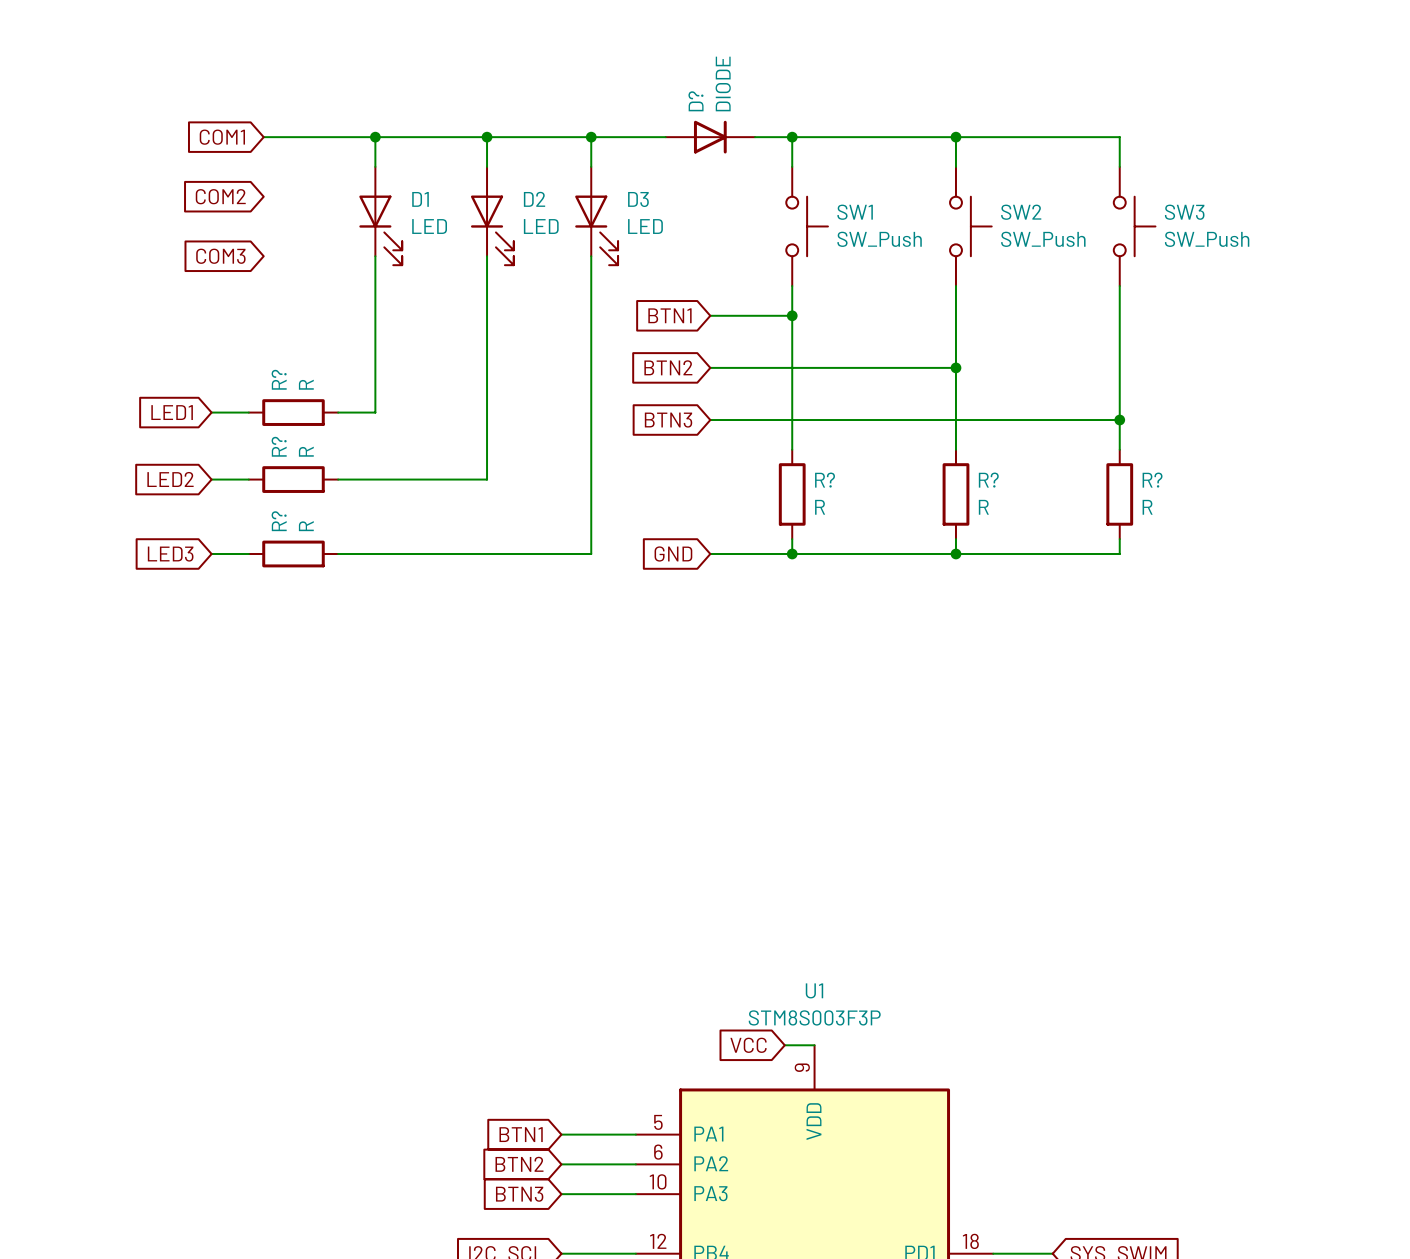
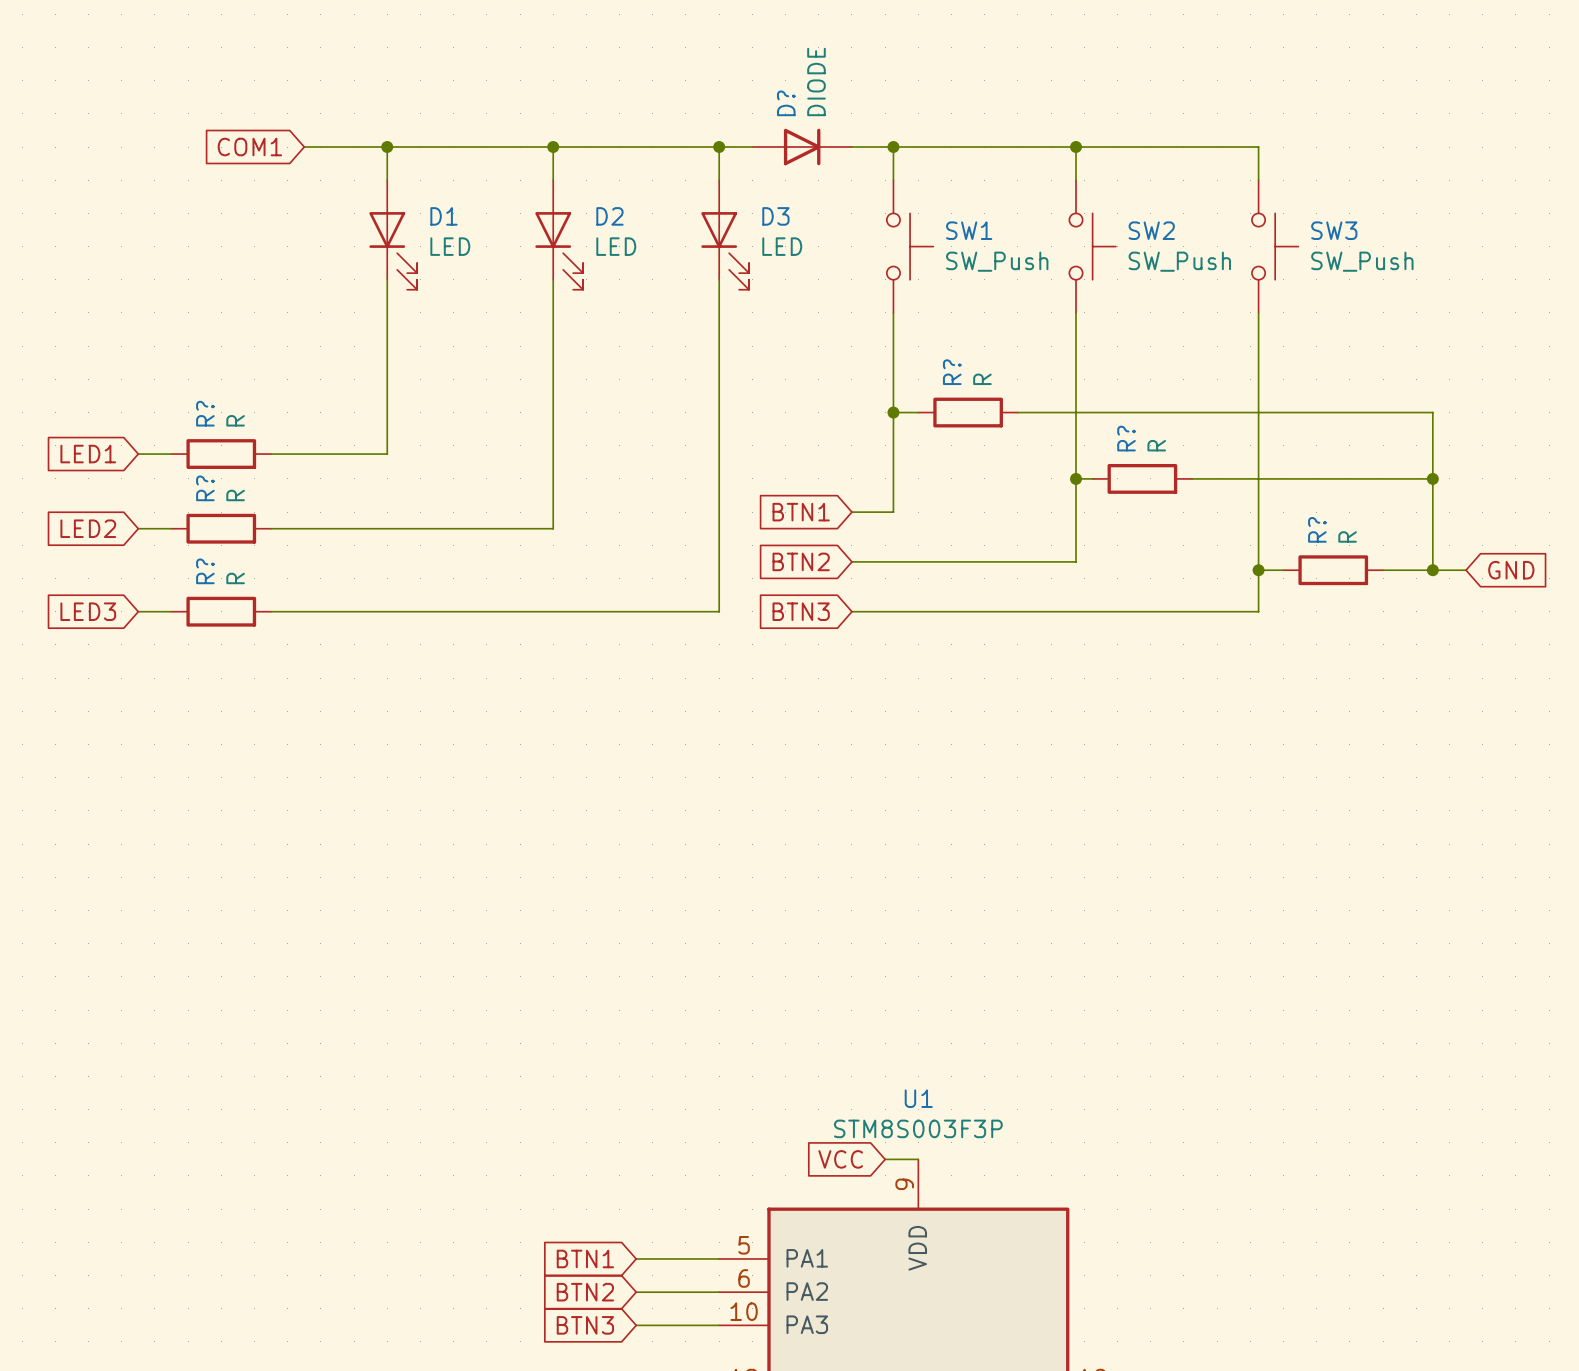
wire: (375, 137) (375, 166) -> (387, 147) (387, 180)
junction position: (375, 137) -> (387, 147)
wire: (591, 137) (591, 166) -> (719, 147) (719, 180)
junction position: (591, 137) -> (719, 147)
global label: COM2 (220, 196) -> none
D1 position: (380, 216) -> (393, 234)
D3 position: (596, 216) -> (725, 234)
global label: COM3 (220, 256) -> none
wire: none -> (387, 279) (387, 454) (287, 454)
wire: (375, 256) (375, 412) (338, 412) -> none
wire: (591, 256) (591, 553) -> (719, 279) (719, 611) (669, 611)
global label position: BTN1 (669, 315) -> BTN1 (801, 512)
wire: (710, 315) (792, 315) -> none
junction position: (792, 315) -> (893, 412)
global label position: BTN2 (668, 367) -> BTN2 (801, 561)
wire: (710, 367) (955, 367) -> none
junction: (955, 367) -> none
wire: none -> (893, 412) (918, 412)
R?: none -> R (968, 412)
wire: none -> (1017, 412) (1432, 412) (1432, 570)
wire: none -> (138, 454) (171, 454)
global label position: LED1 (172, 412) -> LED1 (88, 454)
R?: none -> R (221, 454)
R?: R (293, 412) -> none
global label position: BTN3 (668, 420) -> BTN3 (801, 611)
wire: (710, 420) (1119, 420) -> none
junction: (1119, 420) -> none
wire: none -> (1076, 478) (1092, 478)
junction: none -> (1076, 478)
R?: none -> R (1142, 478)
wire: none -> (1192, 478) (1432, 478)
junction: none -> (1432, 478)
wire: none -> (893, 495) (893, 512) (851, 512)
wire: none -> (1076, 495) (1076, 561) (851, 561)
wire: none -> (1258, 495) (1258, 595)
wire: none -> (138, 528) (171, 528)
global label position: LED2 (170, 479) -> LED2 (88, 528)
R?: none -> R (221, 528)
wire: none -> (287, 528) (387, 528)
R?: R (293, 479) -> none
R?: R (792, 494) -> none
R?: R (955, 494) -> none
R?: R (1119, 494) -> none
wire: none -> (1258, 570) (1283, 570)
junction: none -> (1258, 570)
R?: none -> R (1333, 570)
wire: none -> (1383, 570) (1466, 570)
junction: none -> (1432, 570)
global label: none -> GND (1511, 570)
wire: (792, 539) (792, 553) -> none
wire: (955, 539) (955, 553) -> none
wire: none -> (138, 611) (171, 611)
R?: none -> R (221, 611)
wire: none -> (287, 611) (387, 611)
R?: R (293, 553) -> none
global label: GND (673, 553) -> none
wire: (710, 553) (755, 553) -> none
junction: (792, 553) -> none
junction: (955, 553) -> none
global label position: LED3 (170, 554) -> LED3 (88, 611)

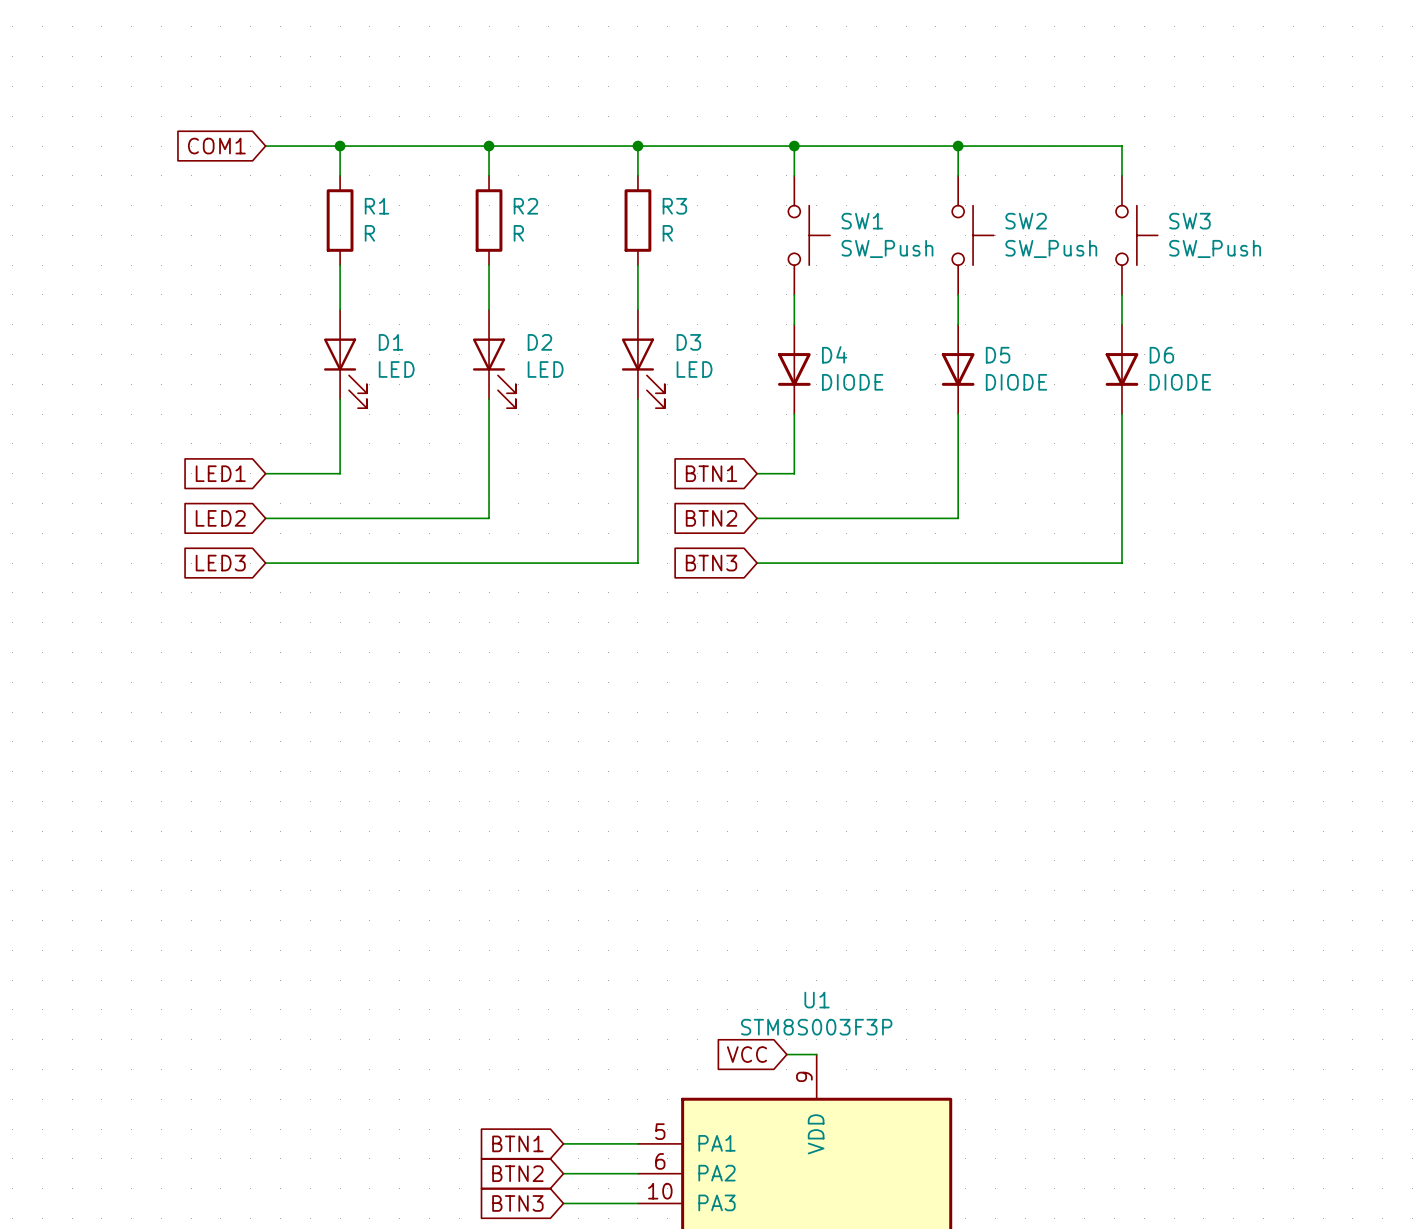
D?: DIODE (802, 147) -> none
R1: none -> R (340, 220)
R2: none -> R (489, 220)
R3: none -> R (637, 220)
D1 position: (393, 234) -> (345, 359)
D2 position: (559, 234) -> (494, 359)
D3 position: (725, 234) -> (643, 359)
D4: none -> DIODE (794, 369)
D5: none -> DIODE (958, 369)
D6: none -> DIODE (1121, 369)
junction: (893, 412) -> none
R?: R (968, 412) -> none
wire: (1017, 412) (1432, 412) (1432, 570) -> none
global label position: LED1 (88, 454) -> LED1 (220, 473)
wire: (138, 454) (171, 454) -> none
R?: R (221, 454) -> none
wire: (271, 454) (387, 454) -> (265, 473) (340, 473) (340, 421)
wire: (1076, 478) (1092, 478) -> none
junction: (1076, 478) -> none
R?: R (1142, 478) -> none
wire: (1192, 478) (1432, 478) -> none
junction: (1432, 478) -> none
global label position: LED2 (88, 528) -> LED2 (220, 518)
wire: (138, 528) (171, 528) -> none
R?: R (221, 528) -> none
wire: (271, 528) (553, 528) -> (265, 518) (489, 518) (489, 488)
wire: (1258, 570) (1283, 570) -> none
junction: (1258, 570) -> none
R?: R (1333, 570) -> none
wire: (1383, 570) (1466, 570) -> none
junction: (1432, 570) -> none
global label: GND (1511, 570) -> none
global label position: LED3 (88, 611) -> LED3 (220, 563)
wire: (138, 611) (171, 611) -> none
R?: R (221, 611) -> none
wire: (271, 611) (304, 611) -> none

